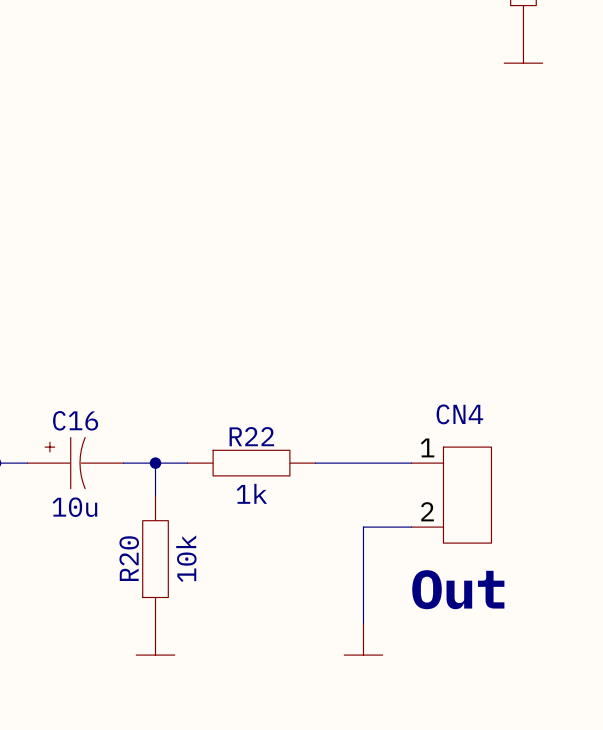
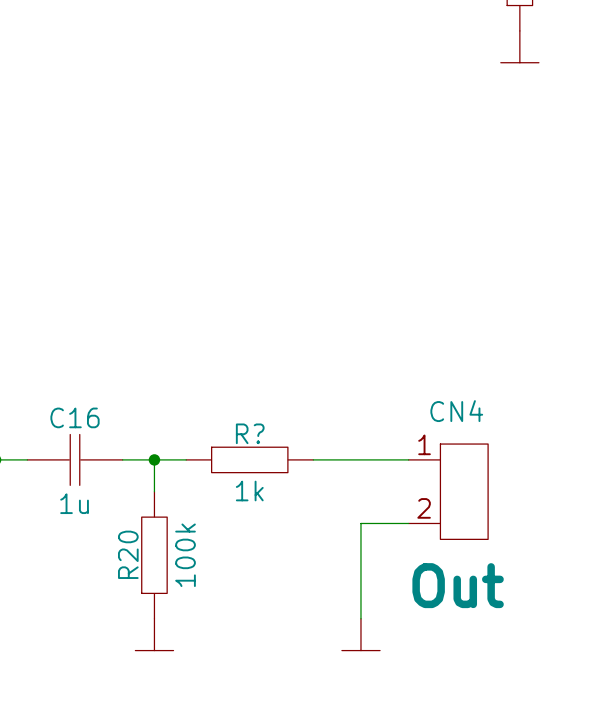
R22 name: R22 (251, 436) -> R? (250, 433)
C16 symbol: [27, 437, 124, 489] -> [27, 434, 123, 486]
C16 value: 10u (74, 507) -> 1u (74, 503)
R20 value: 10k (186, 558) -> 100k (185, 555)

